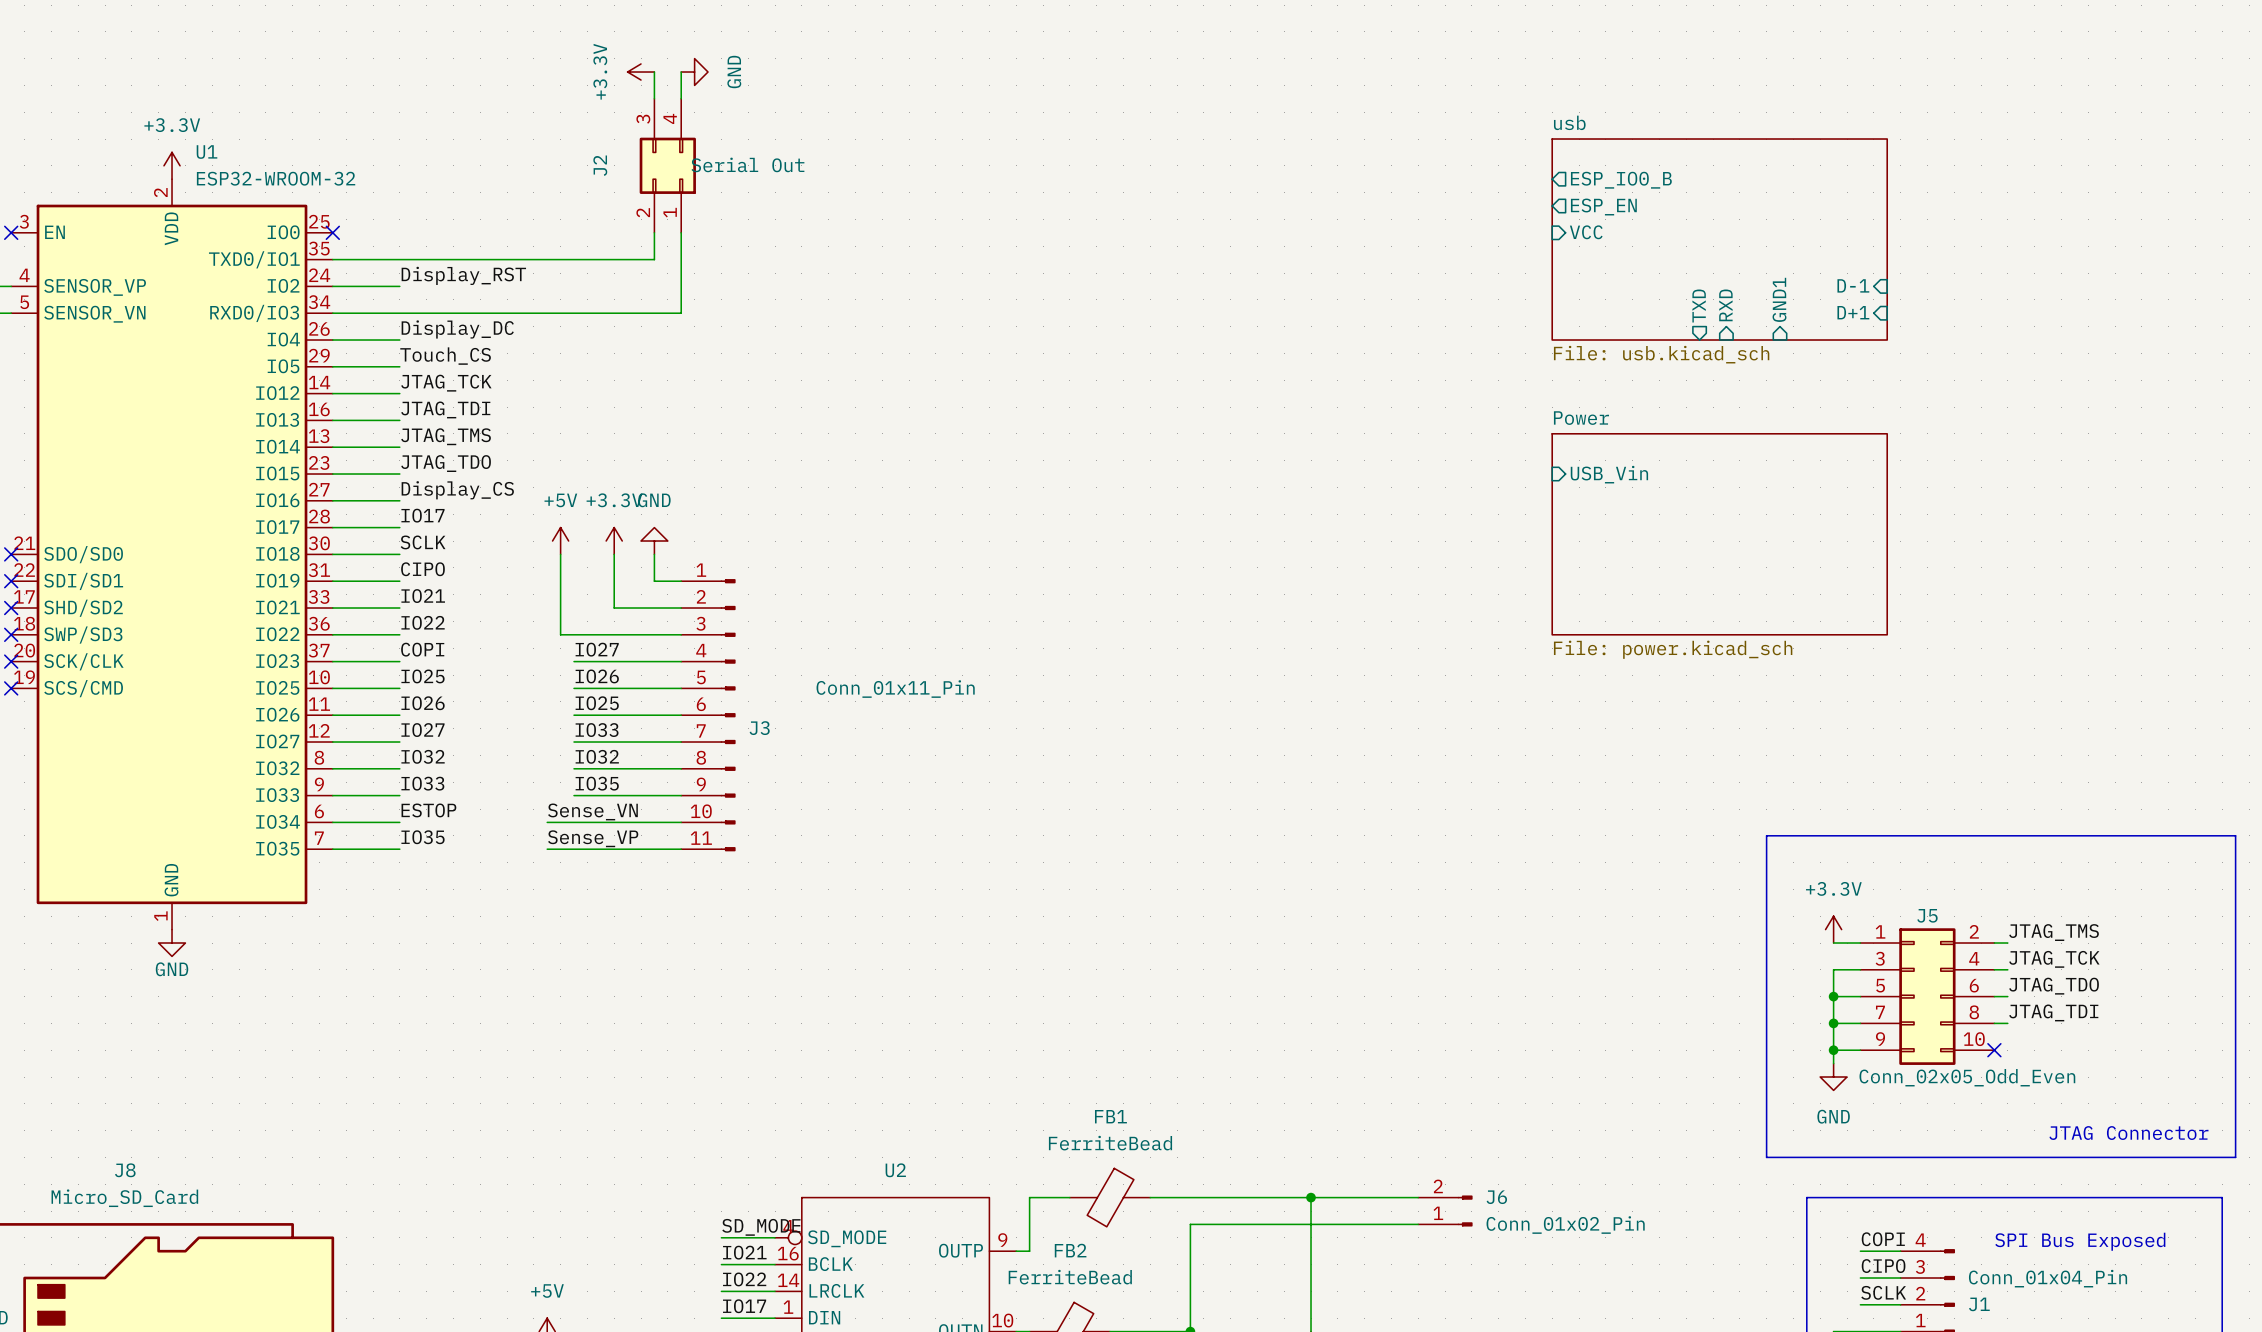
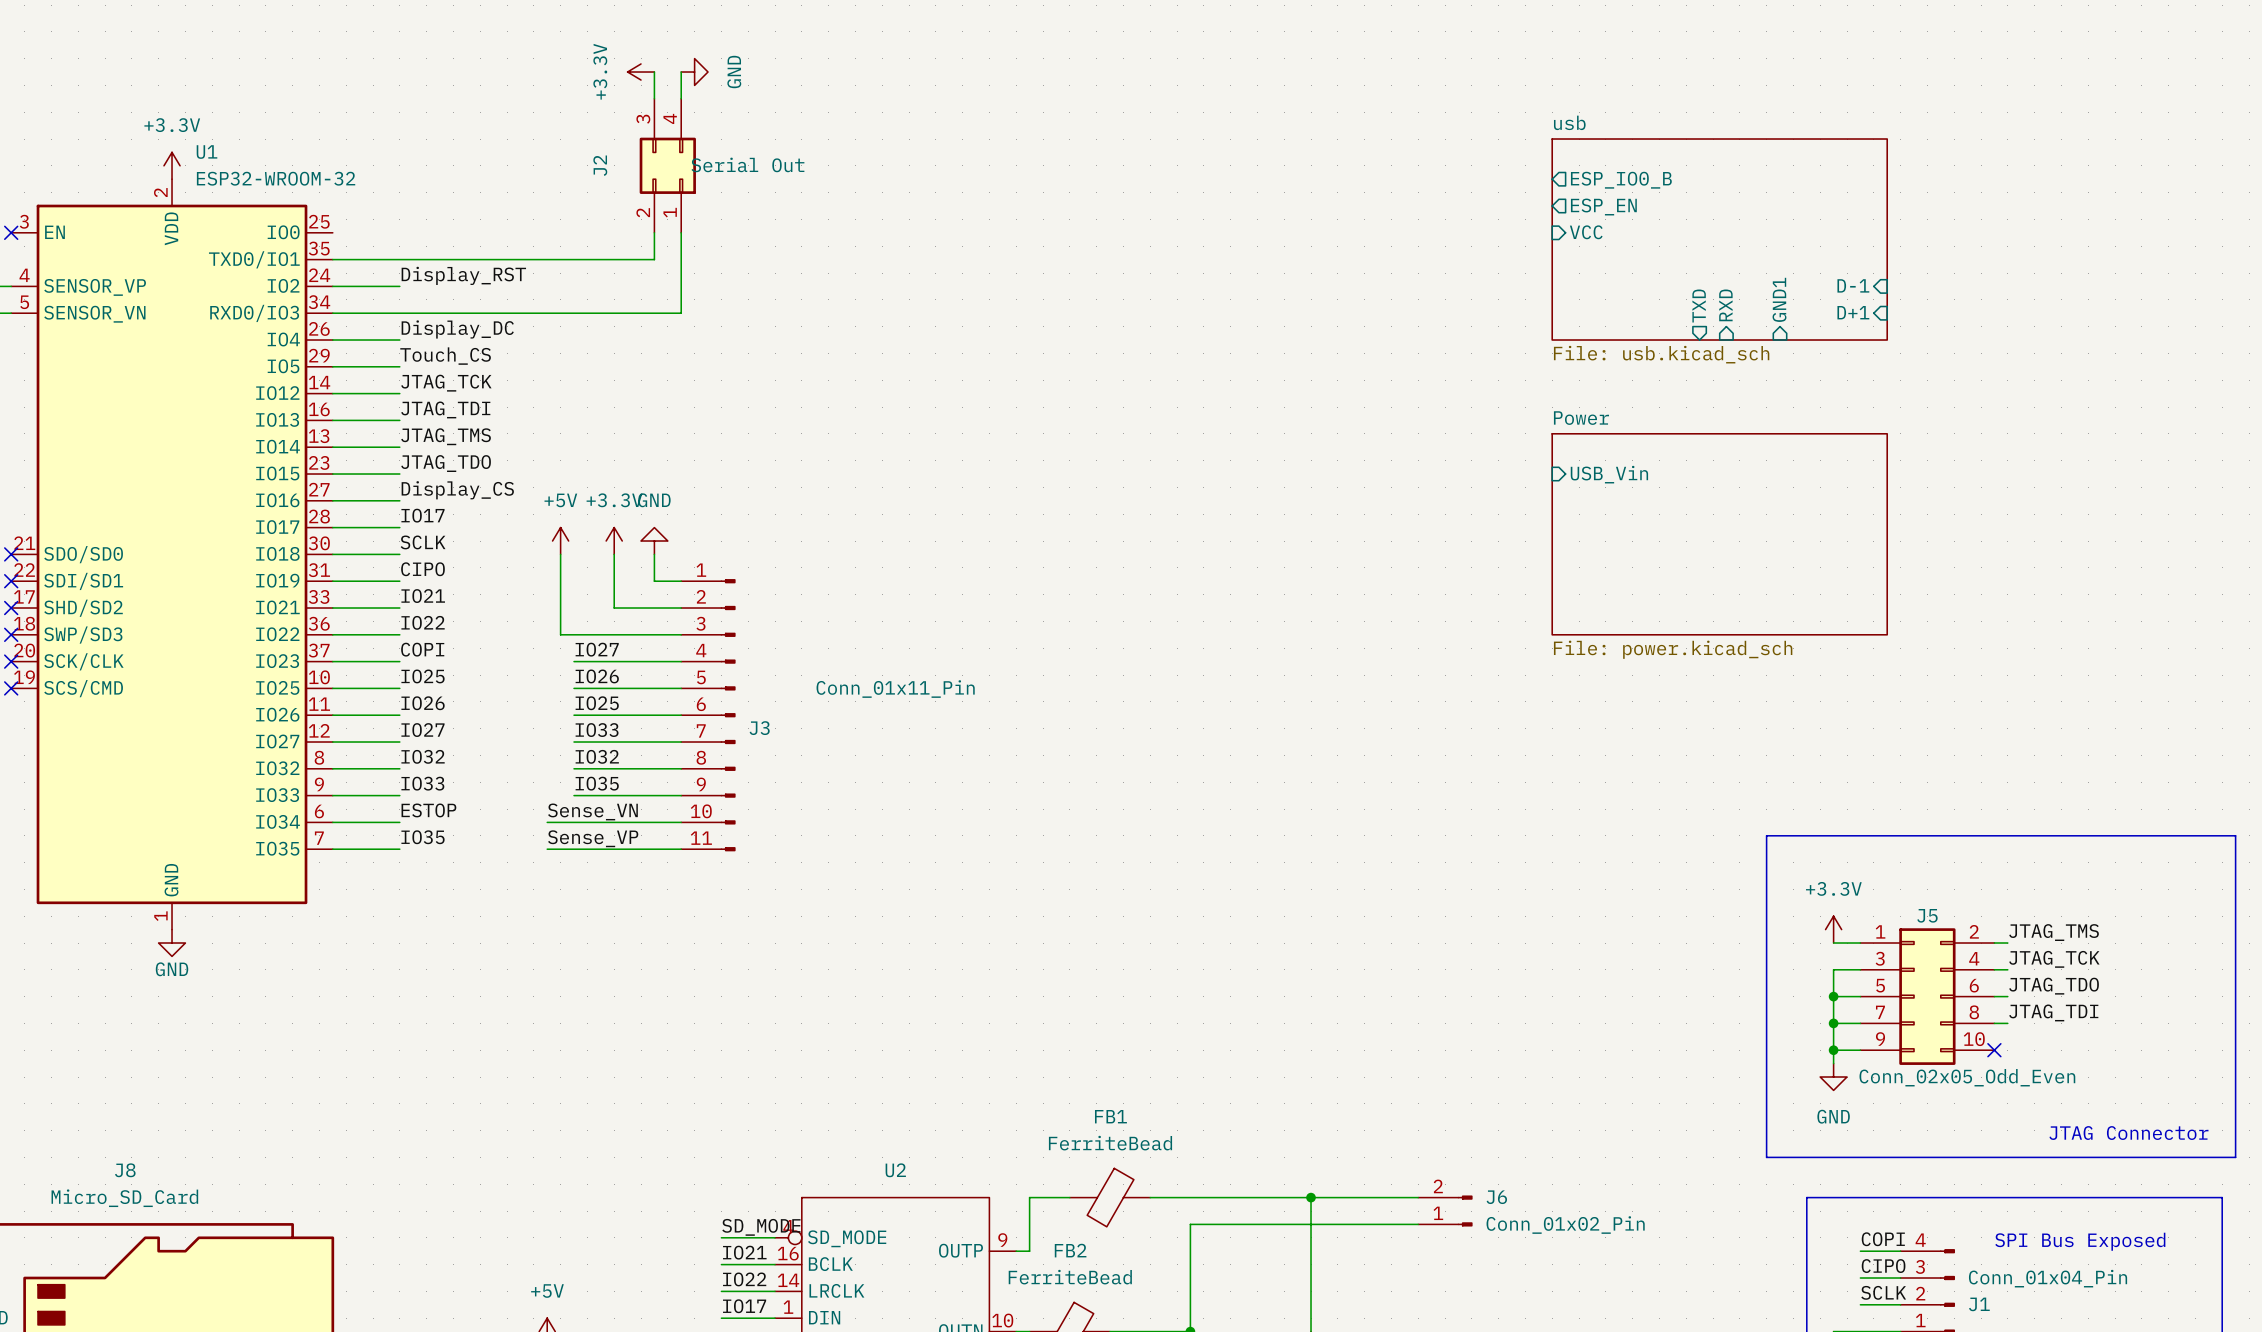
no-connect mark: (332, 232) -> none

